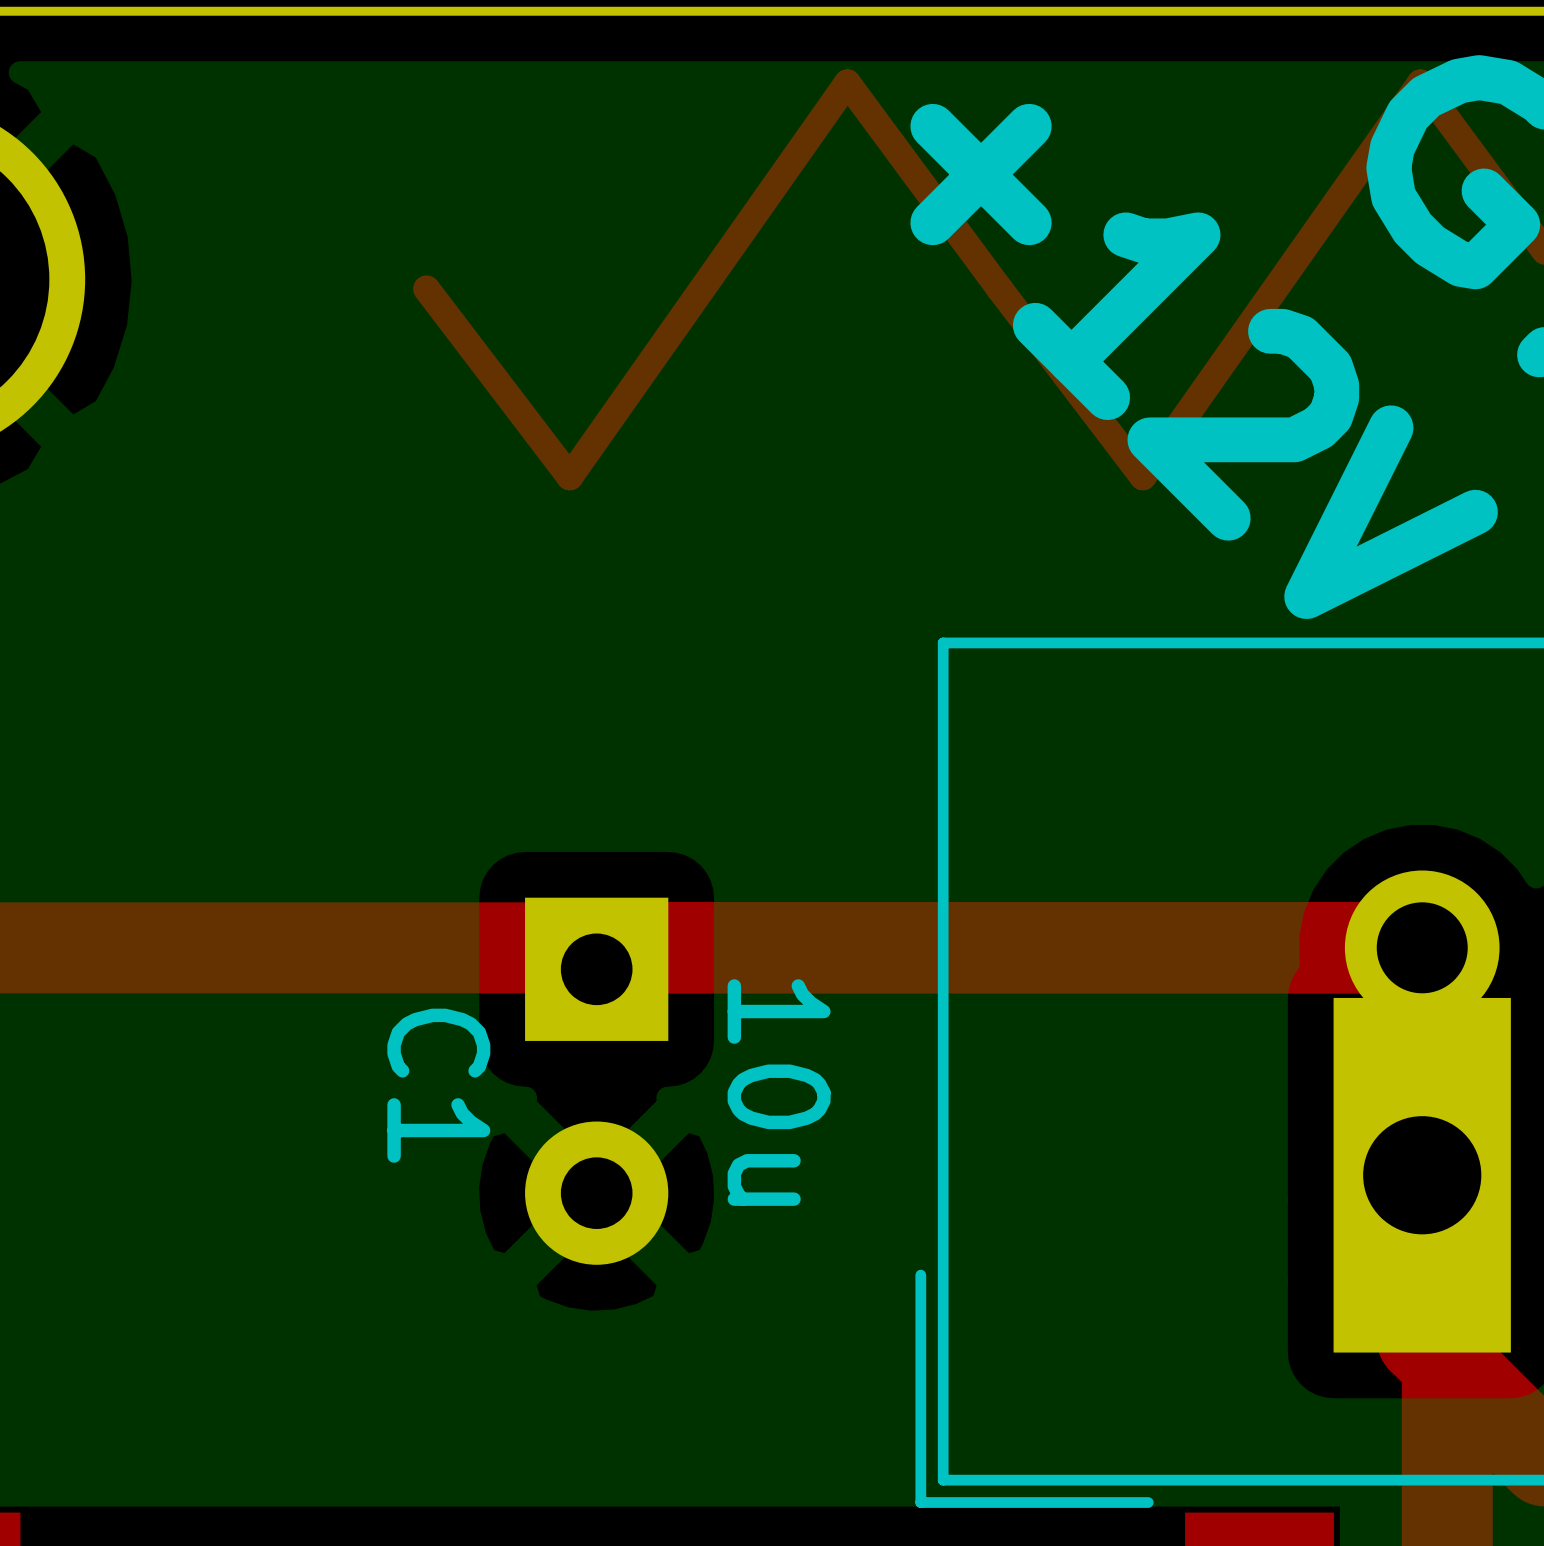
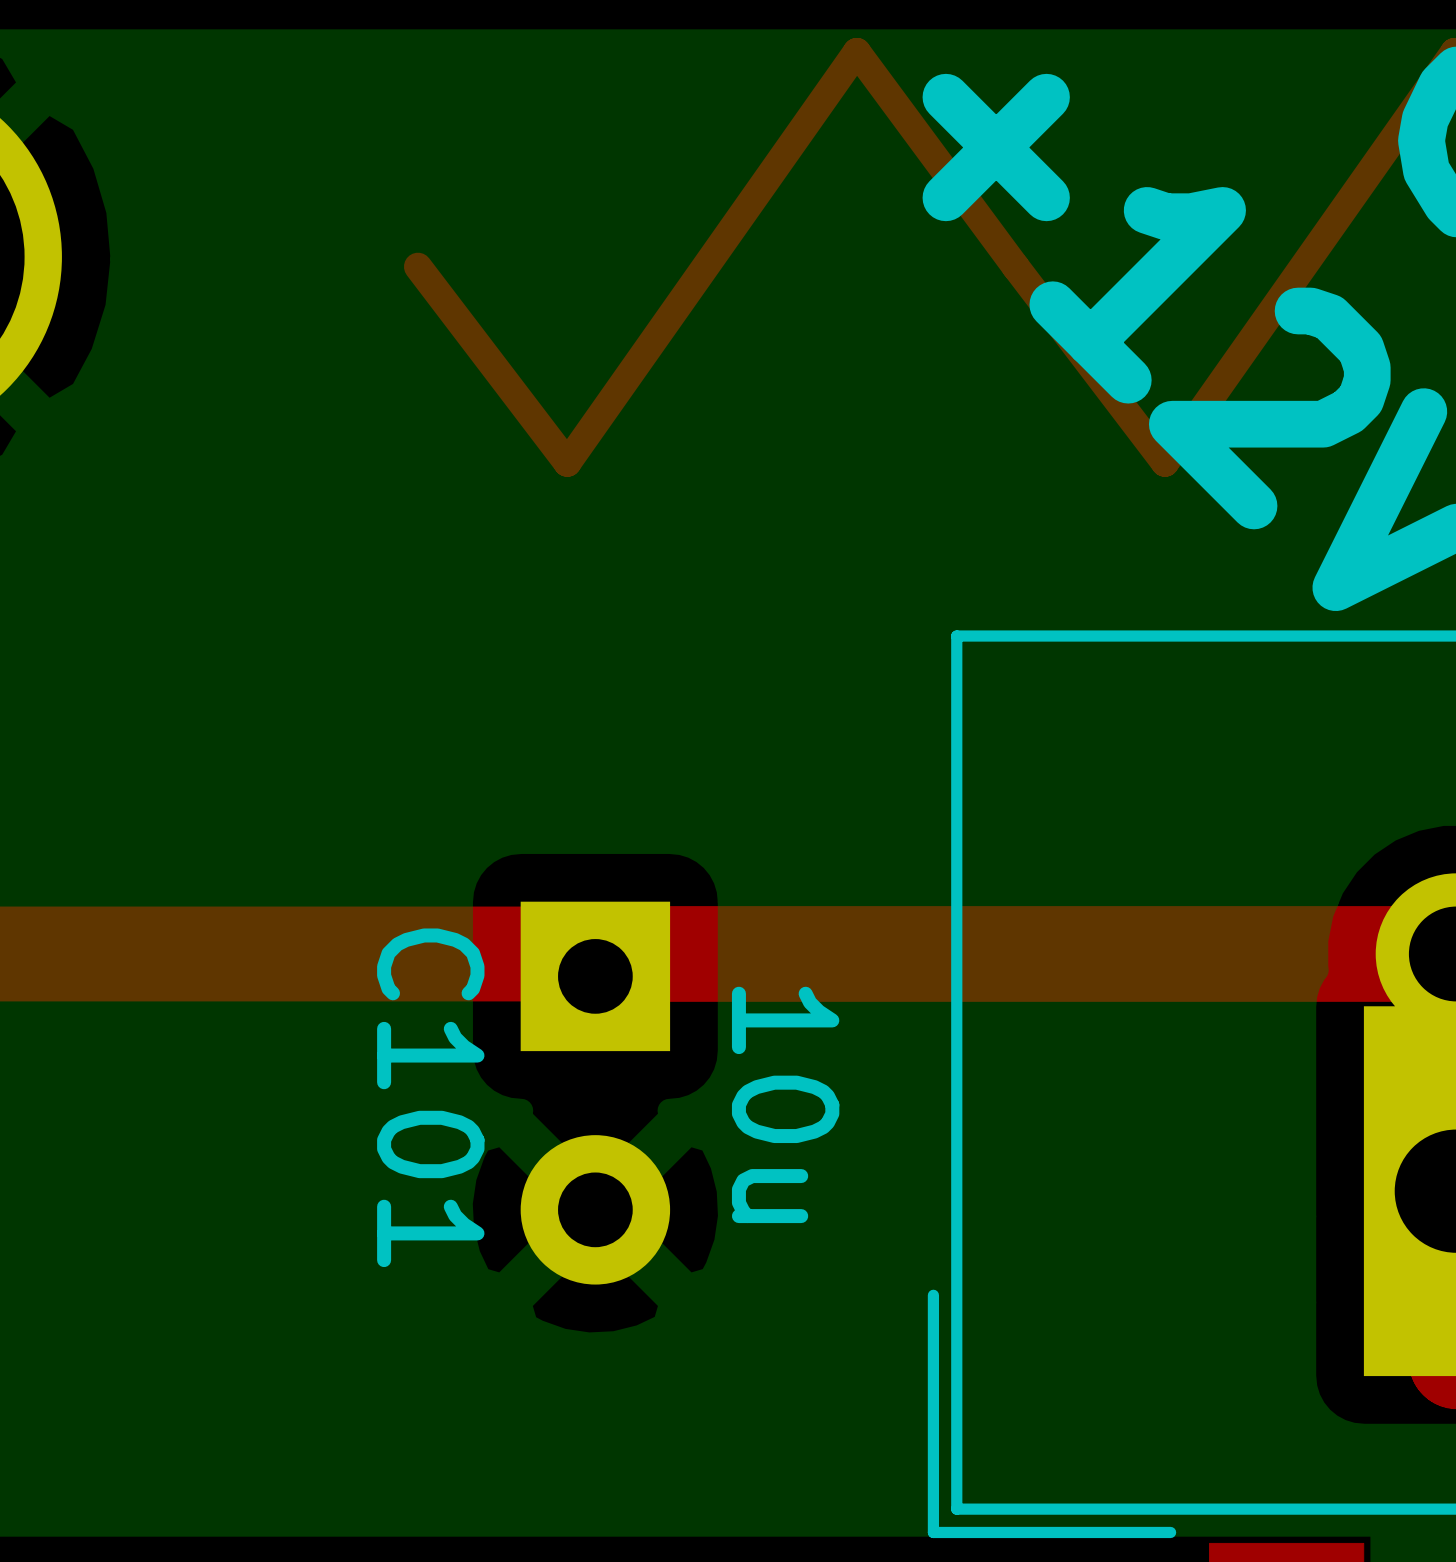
C1 name: C1 (438, 1085) -> C101 (430, 1097)

